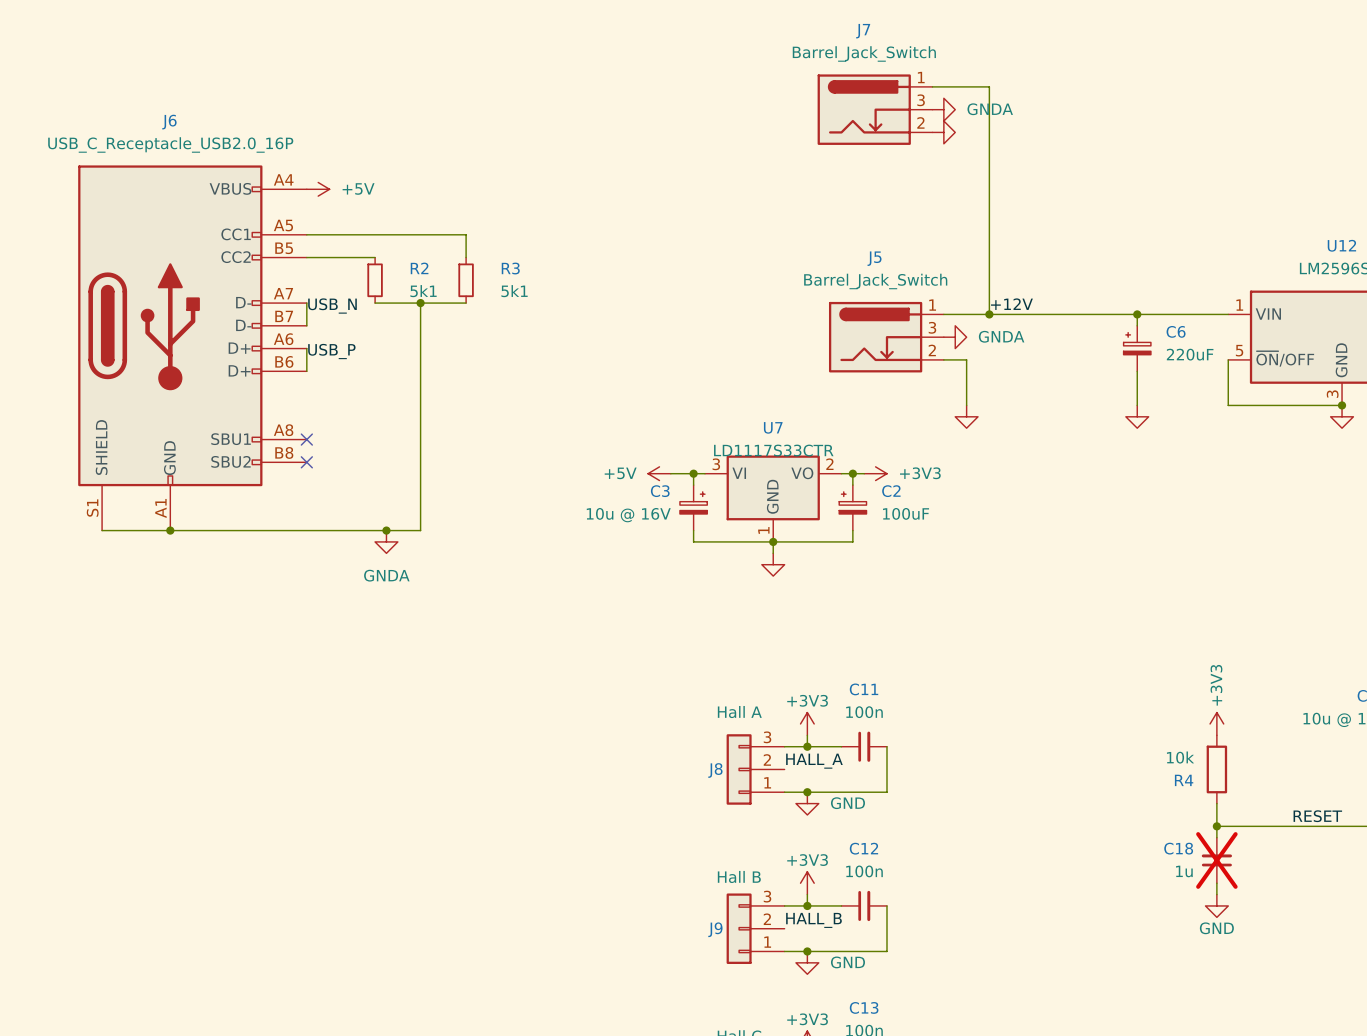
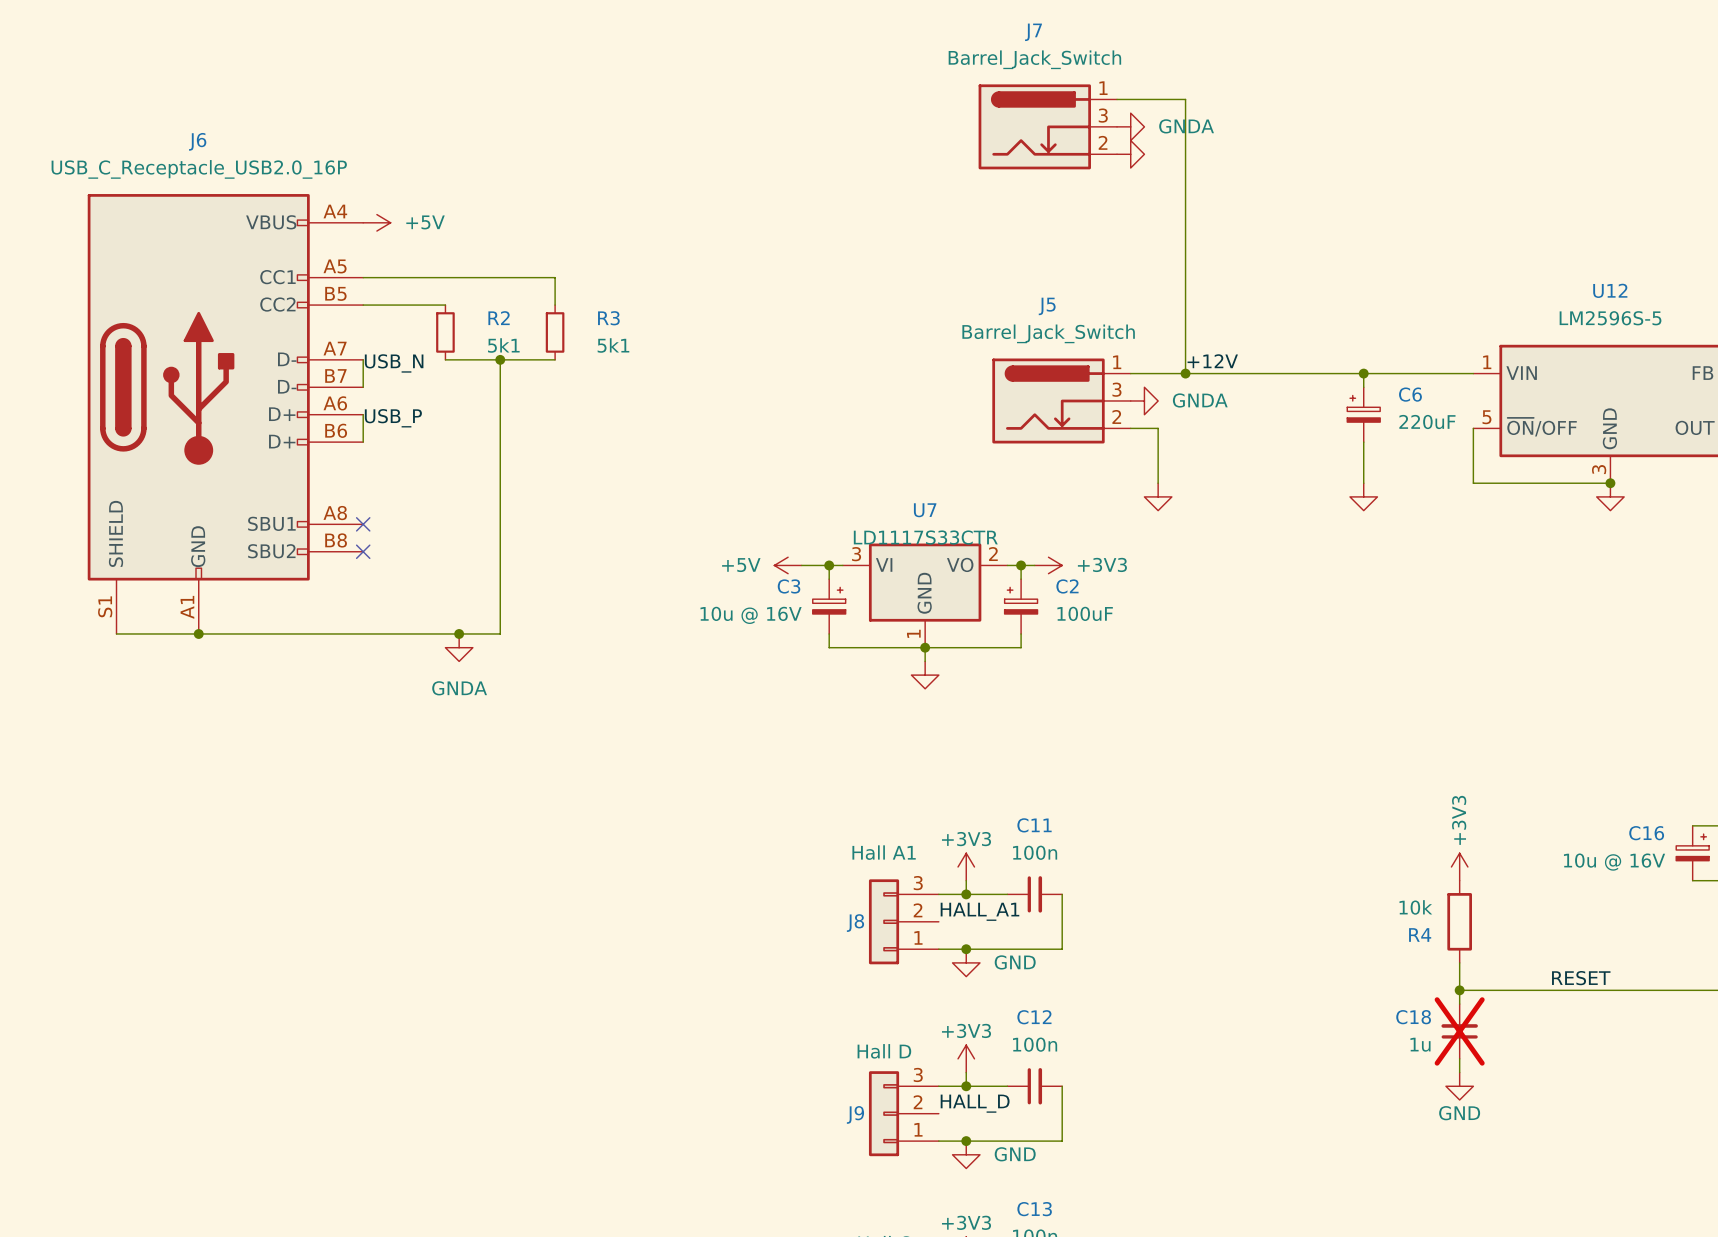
J8 value: Hall A (739, 712) -> Hall A1 (884, 852)
label: HALL_A (814, 761) -> HALL_A1 (979, 911)
J9 value: Hall B (739, 876) -> Hall D (884, 1051)
label: HALL_B (813, 920) -> HALL_D (975, 1103)

